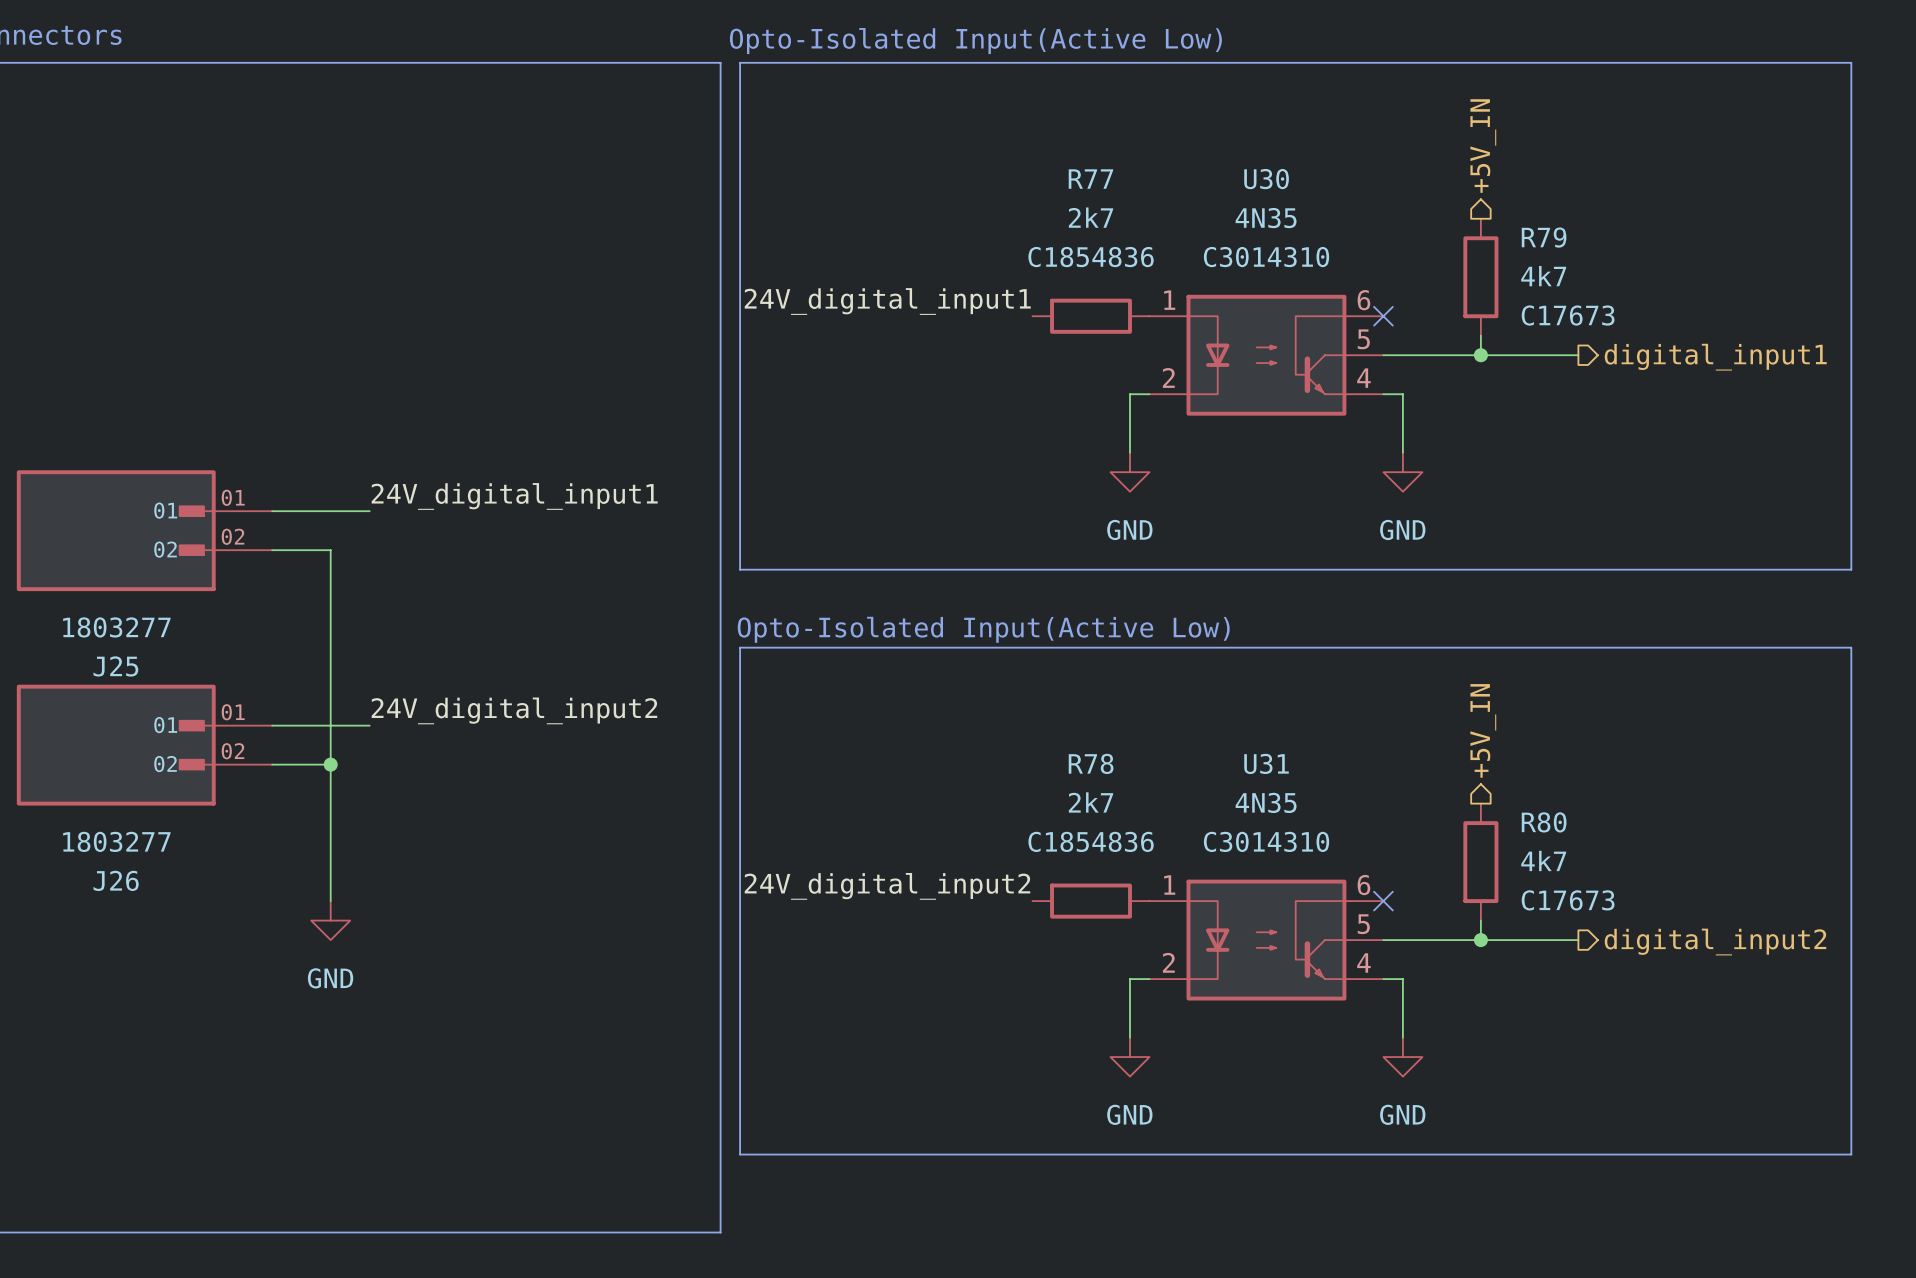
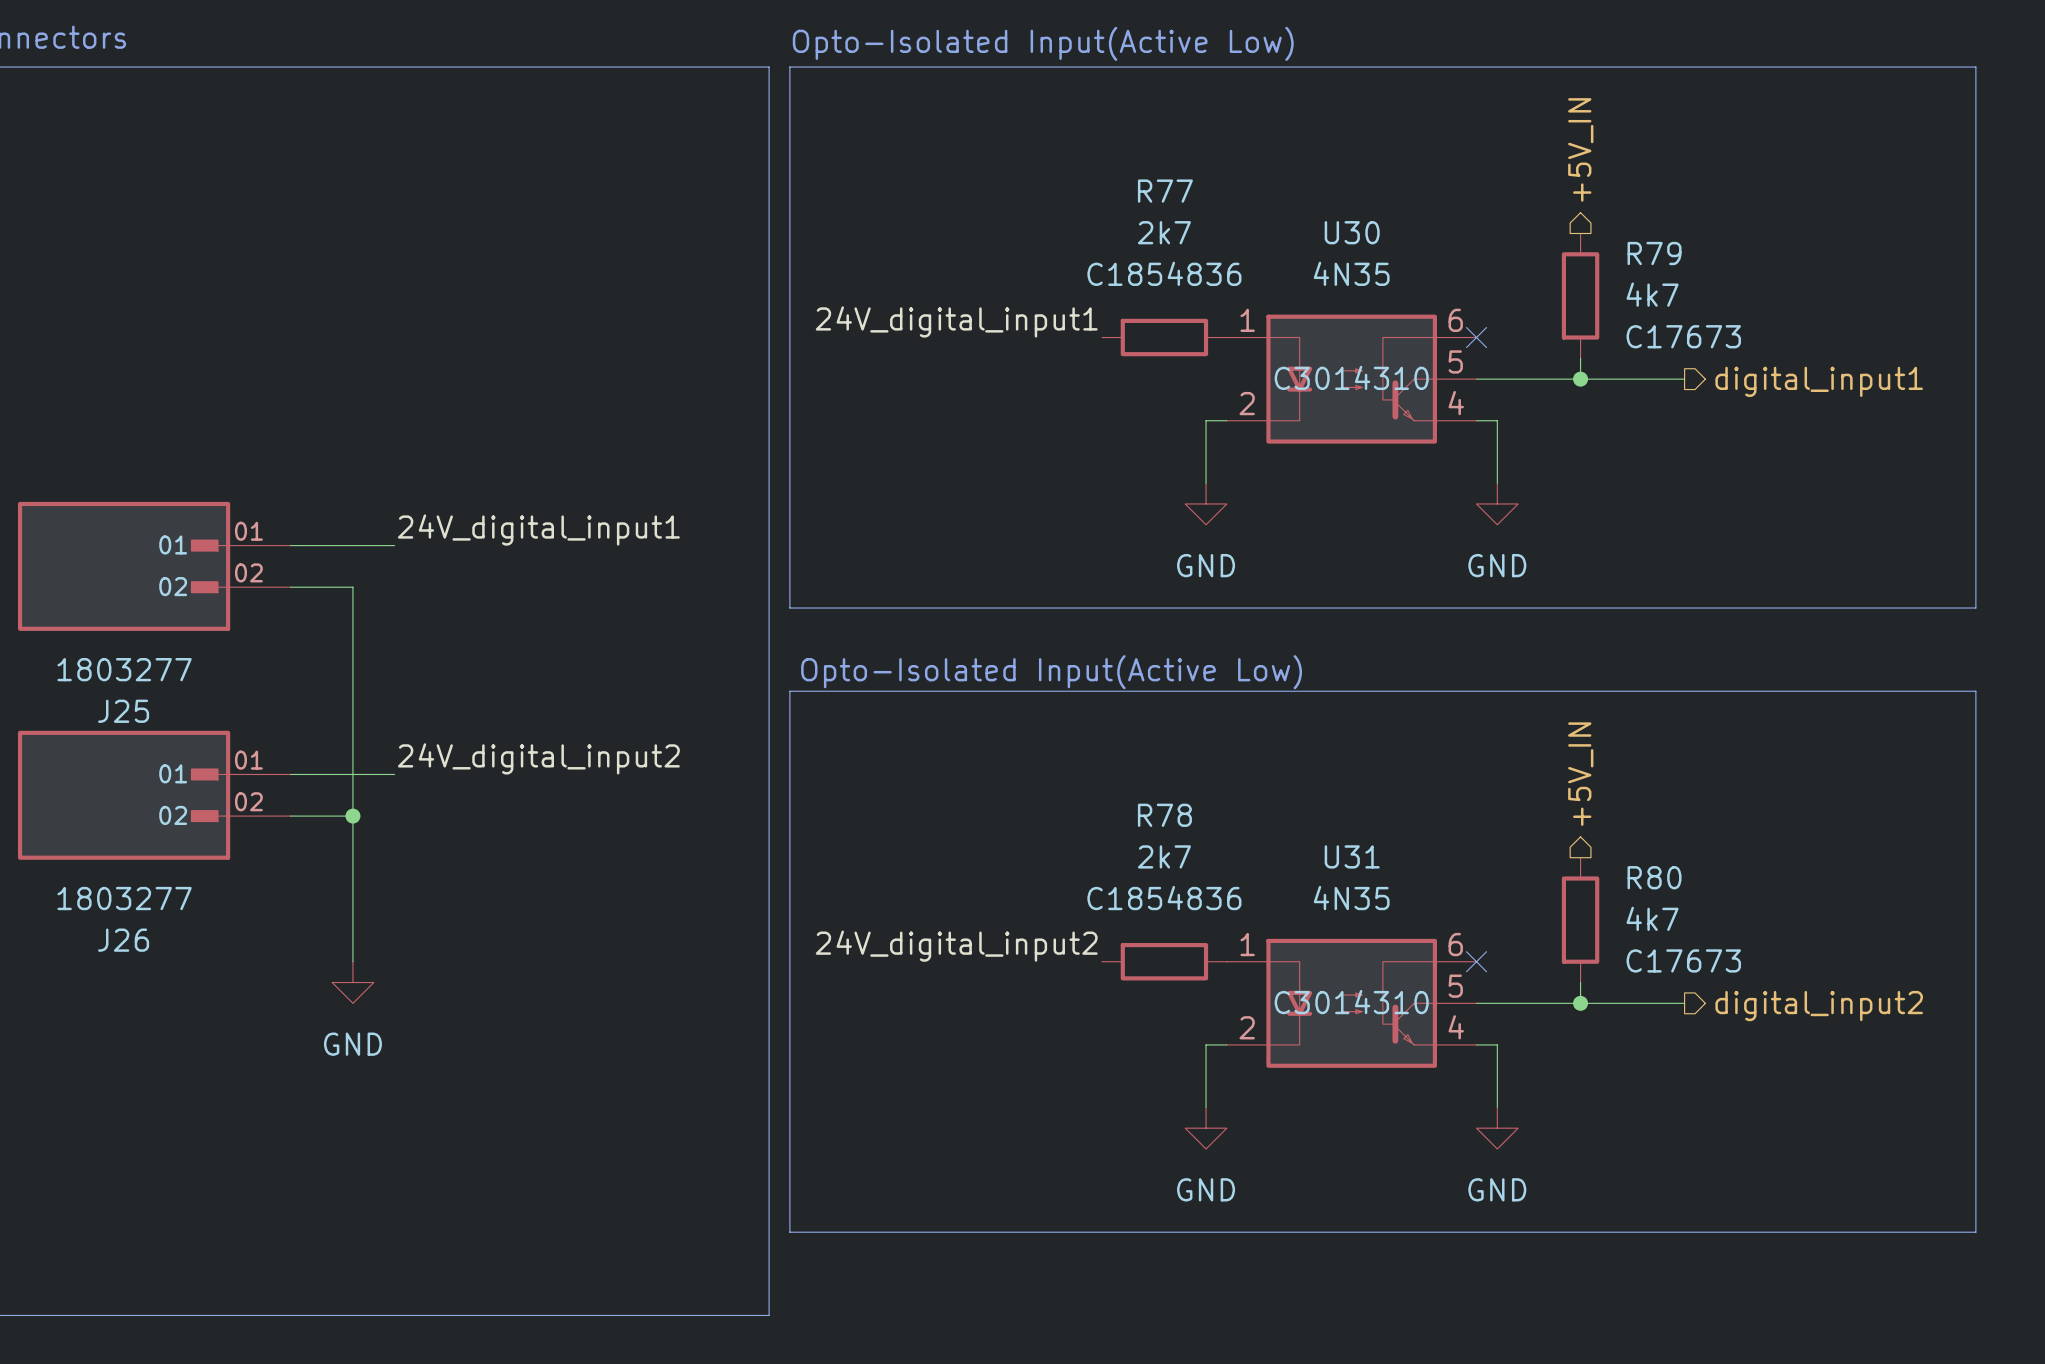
U30 name position: U30 (1266, 179) -> U30 (1352, 232)
U30 value position: 4N35 (1266, 218) -> 4N35 (1351, 273)
U30 text position: C3014310 (1266, 257) -> C3014310 (1351, 377)
U31 name position: U31 (1266, 763) -> U31 (1352, 856)
U31 value position: 4N35 (1266, 802) -> 4N35 (1351, 898)
U31 text position: C3014310 (1266, 841) -> C3014310 (1351, 1002)

